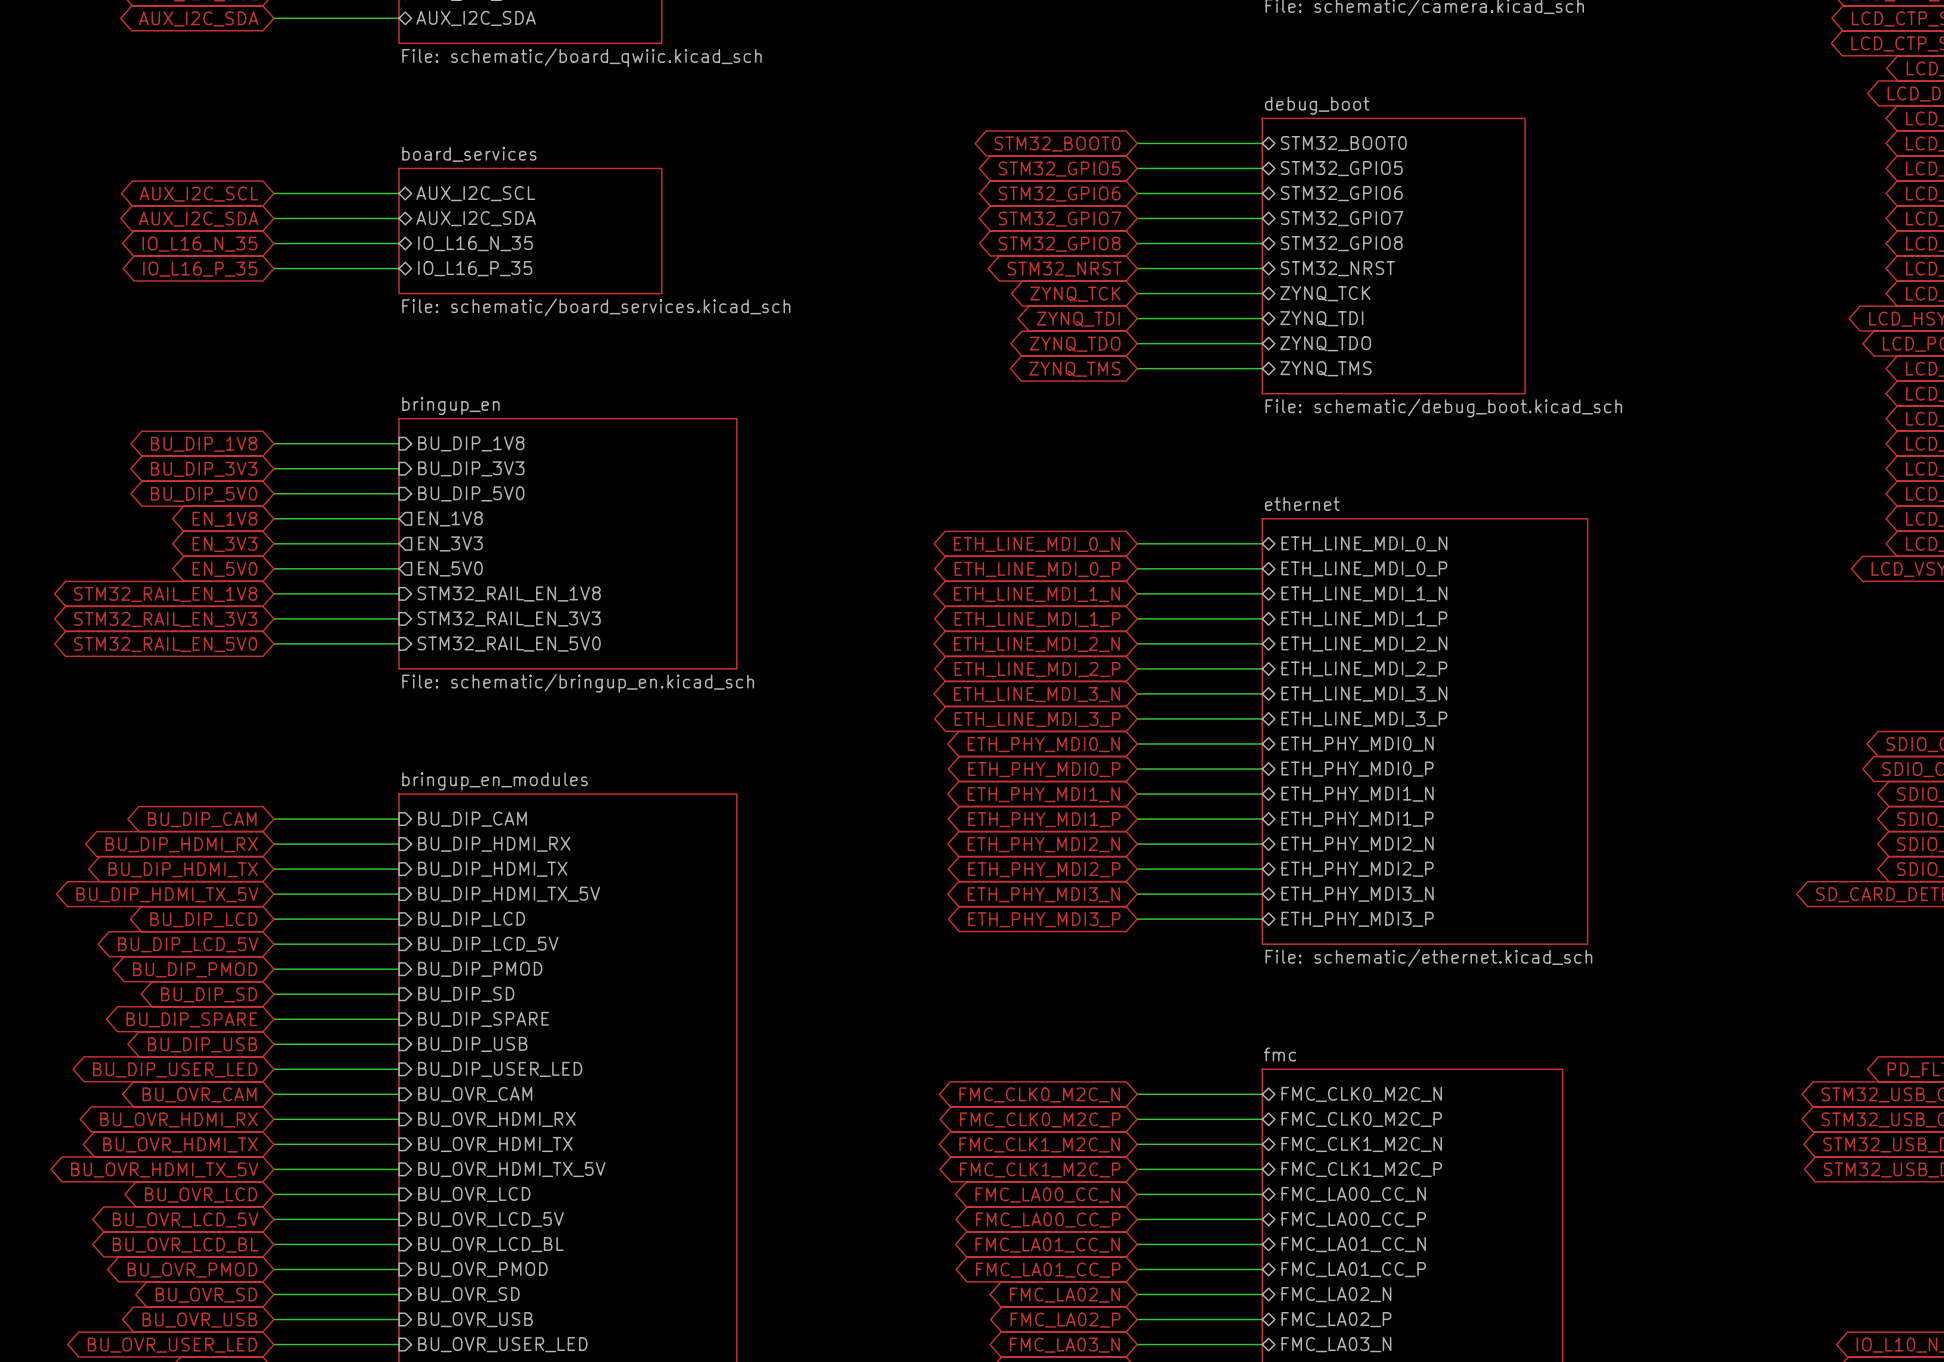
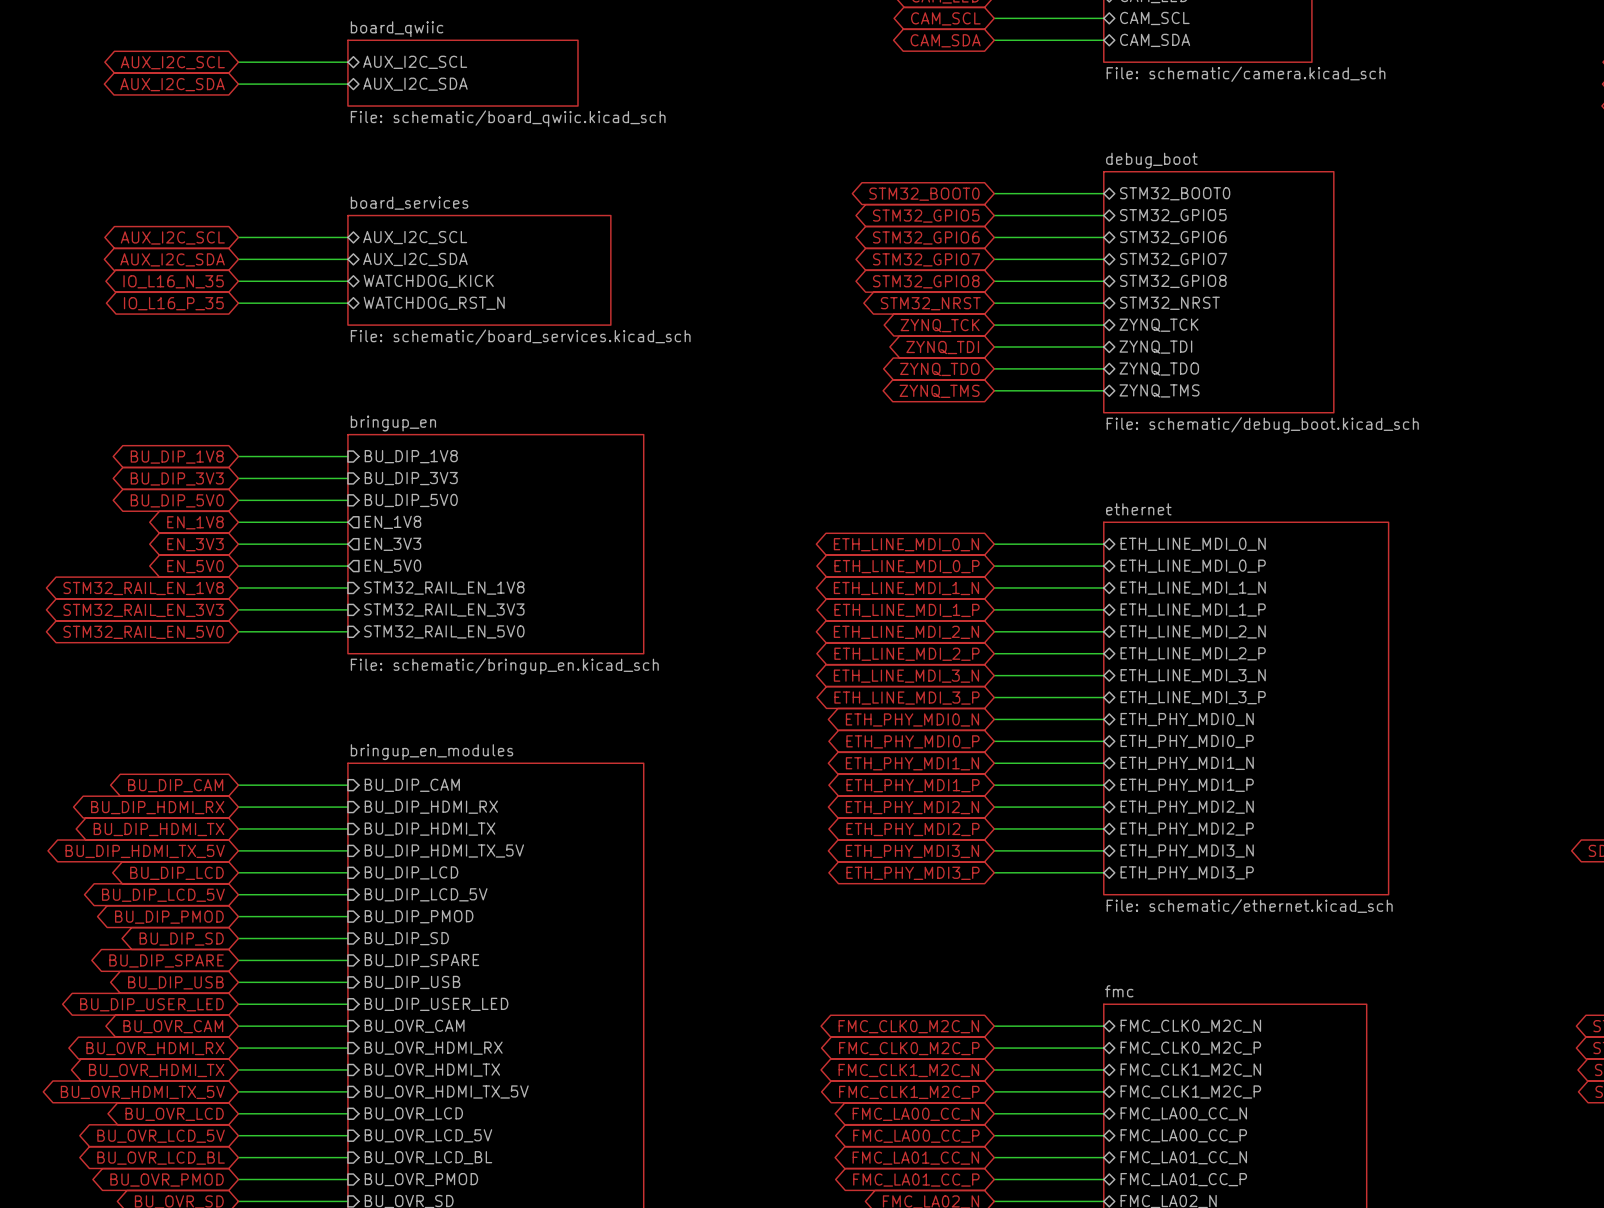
sheet board_services: File: schematic/board_services.kicad_sch (530, 231) -> none
sheet board_services: none -> File: schematic/board_services.kicad_sch (479, 270)
sheet pin: IO_L16_N_35 (475, 243) -> WATCHDOG_KICK (428, 281)
sheet pin: IO_L16_P_35 (475, 268) -> WATCHDOG_RST_N (434, 303)

